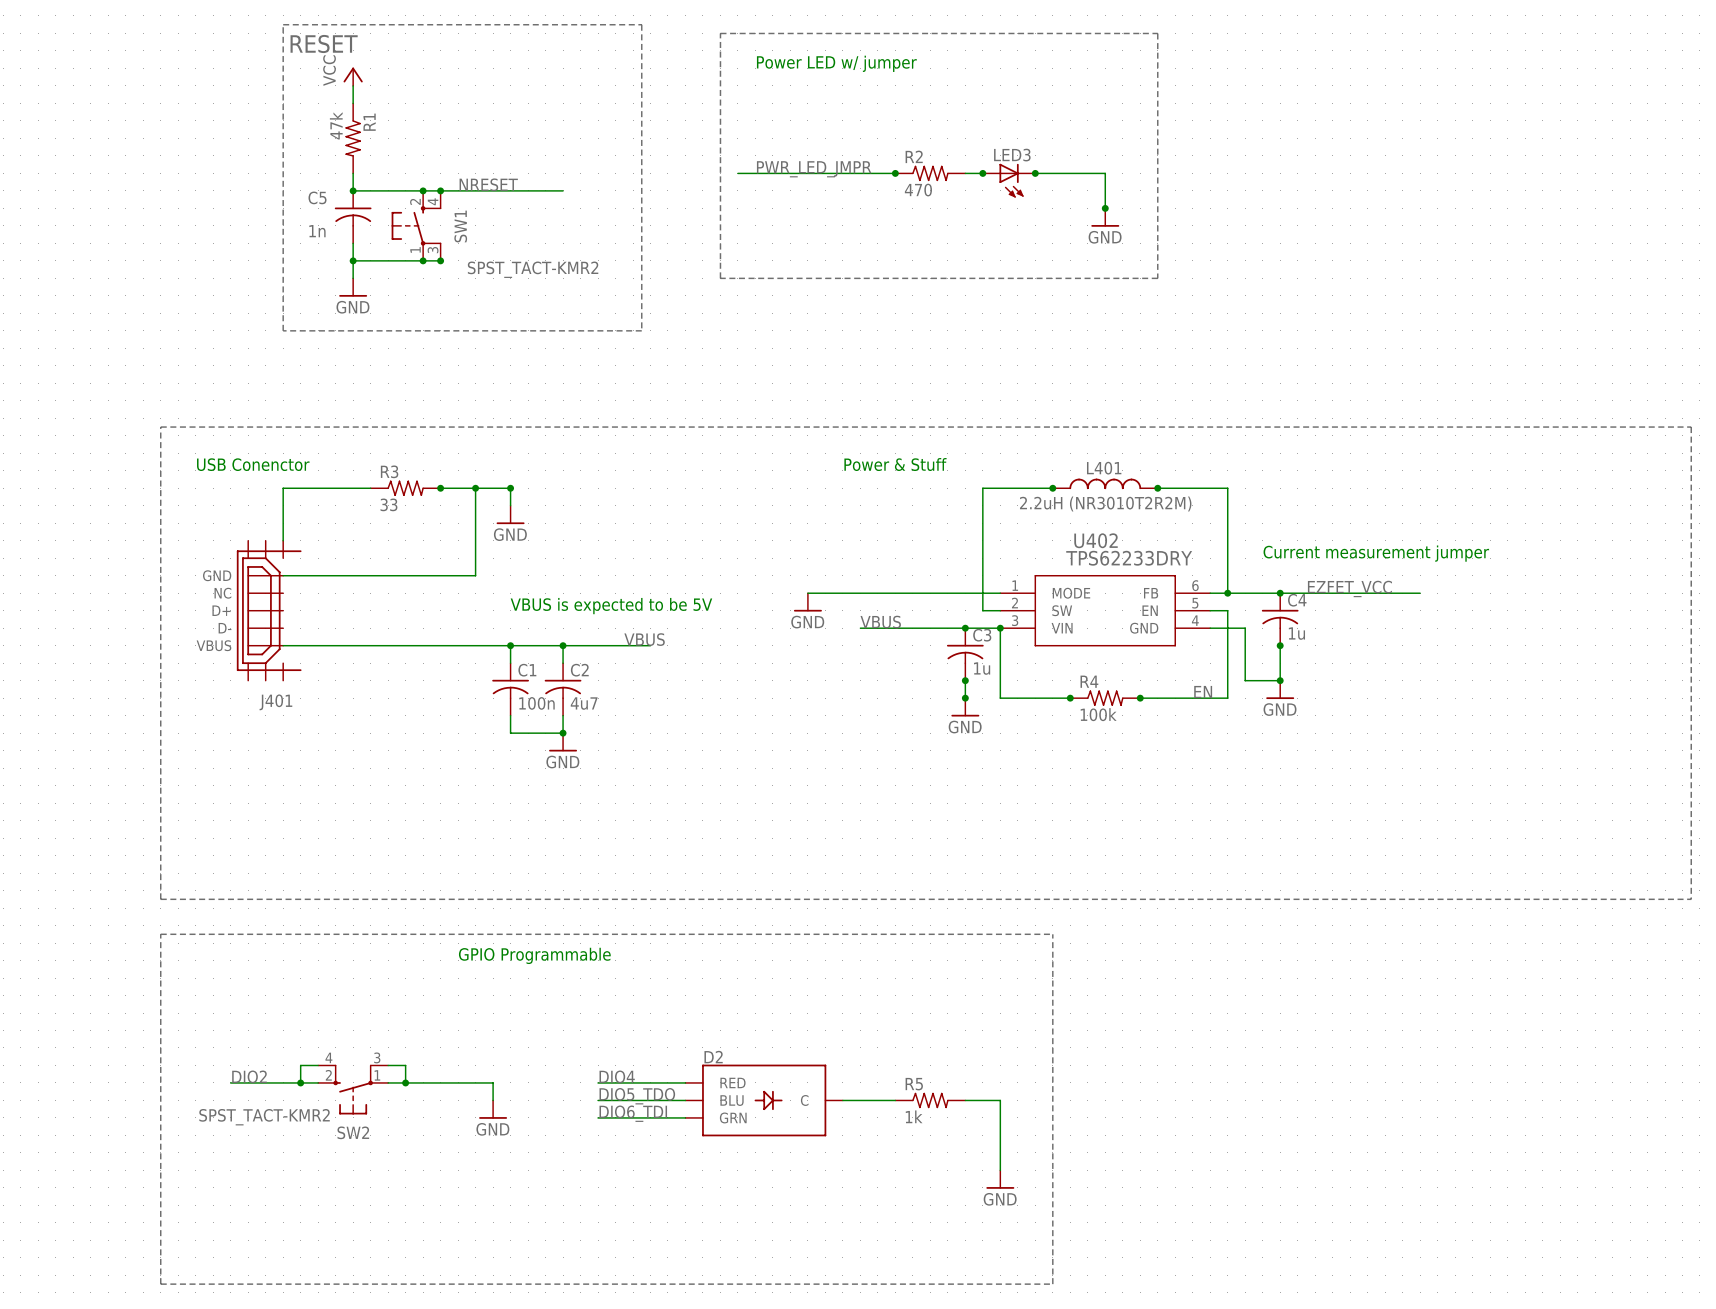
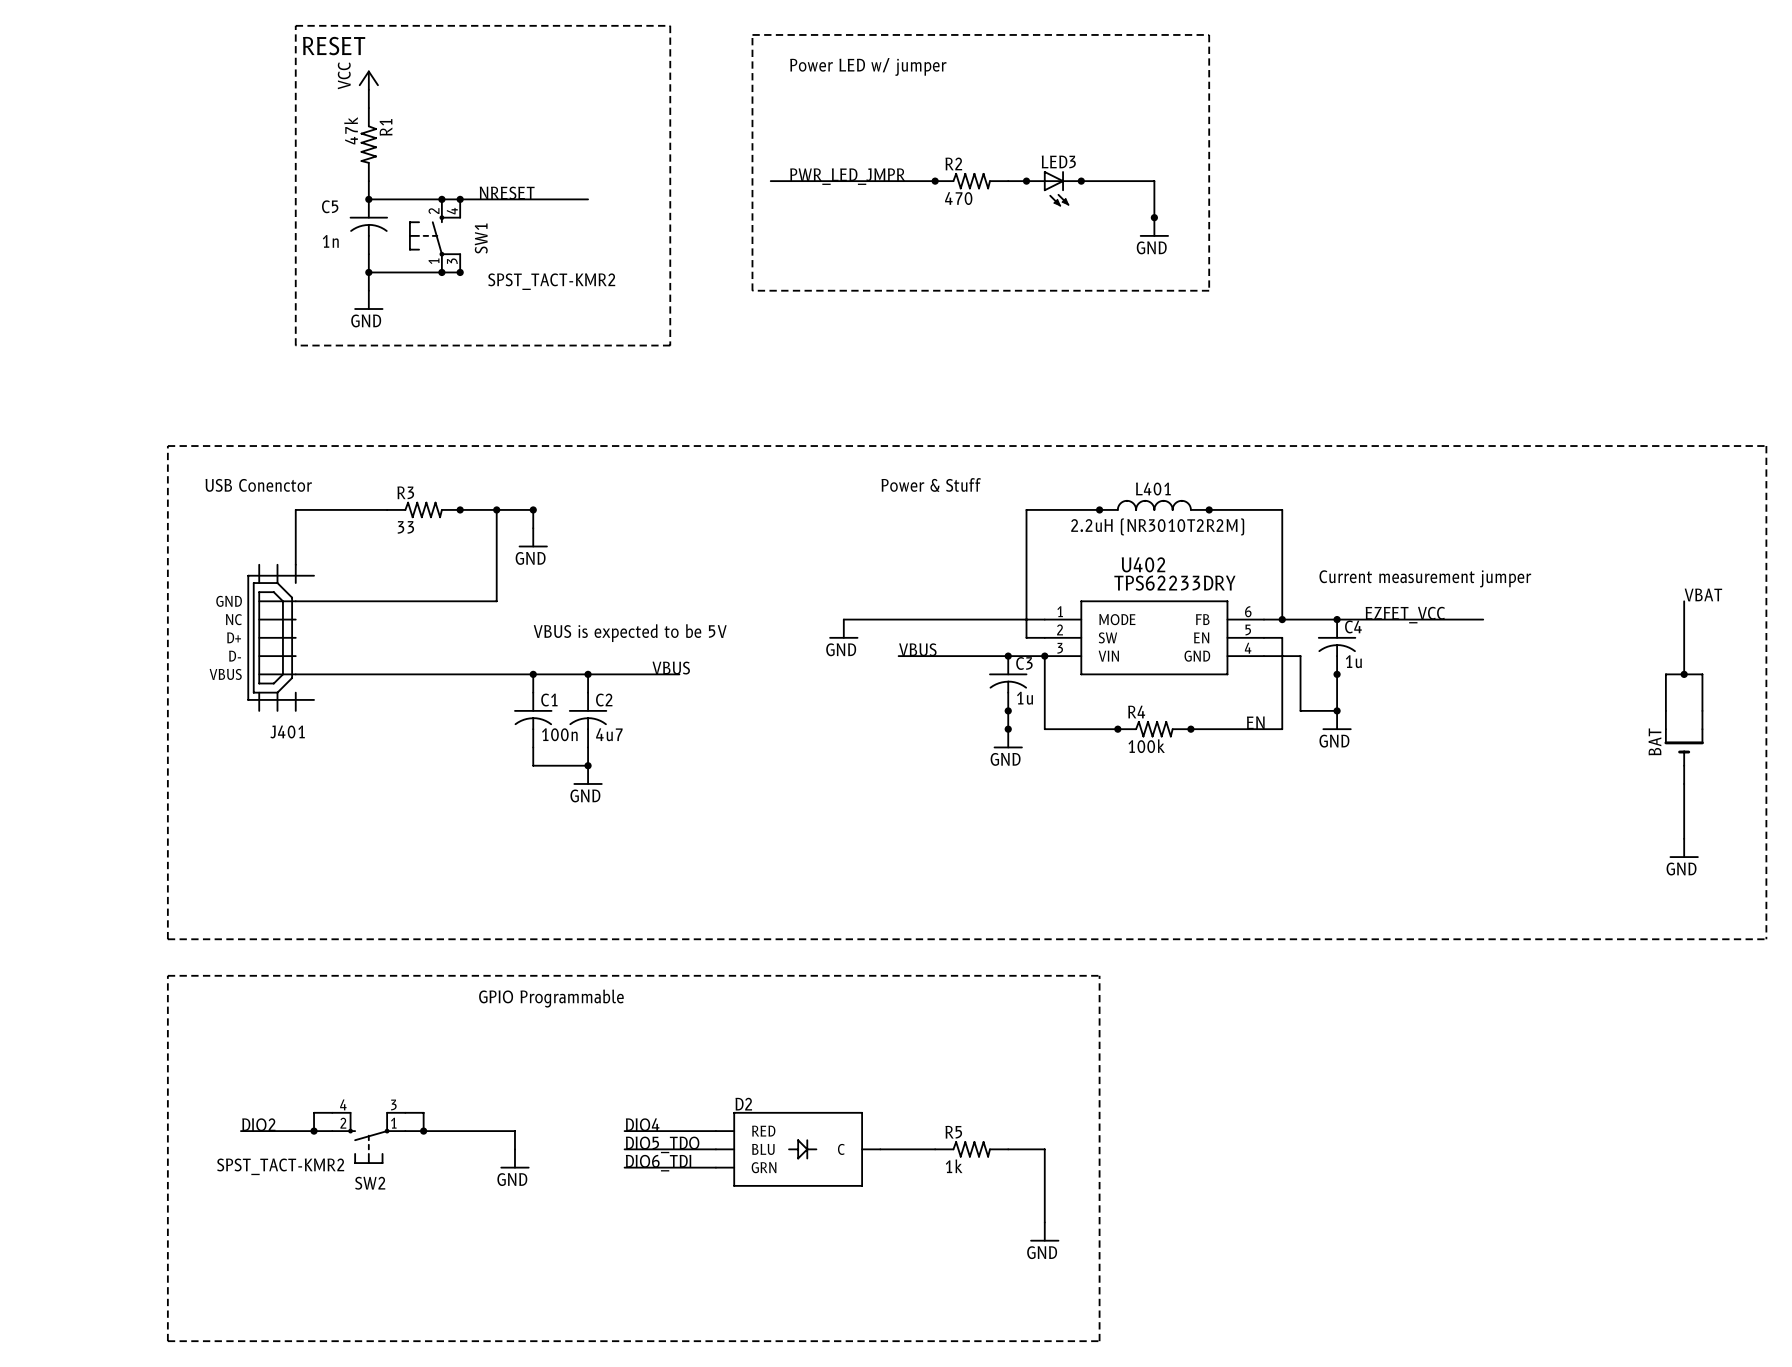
label: none -> VBAT (1703, 594)
wire: none -> (1684, 601) (1684, 674)
junction: none -> (1684, 674)
wire: none -> (1665, 710) (1665, 674) (1702, 674) (1702, 710)
BAT: none -> (1684, 747)
wire: none -> (1684, 783) (1684, 838)
power symbol: none -> GND (1684, 848)

